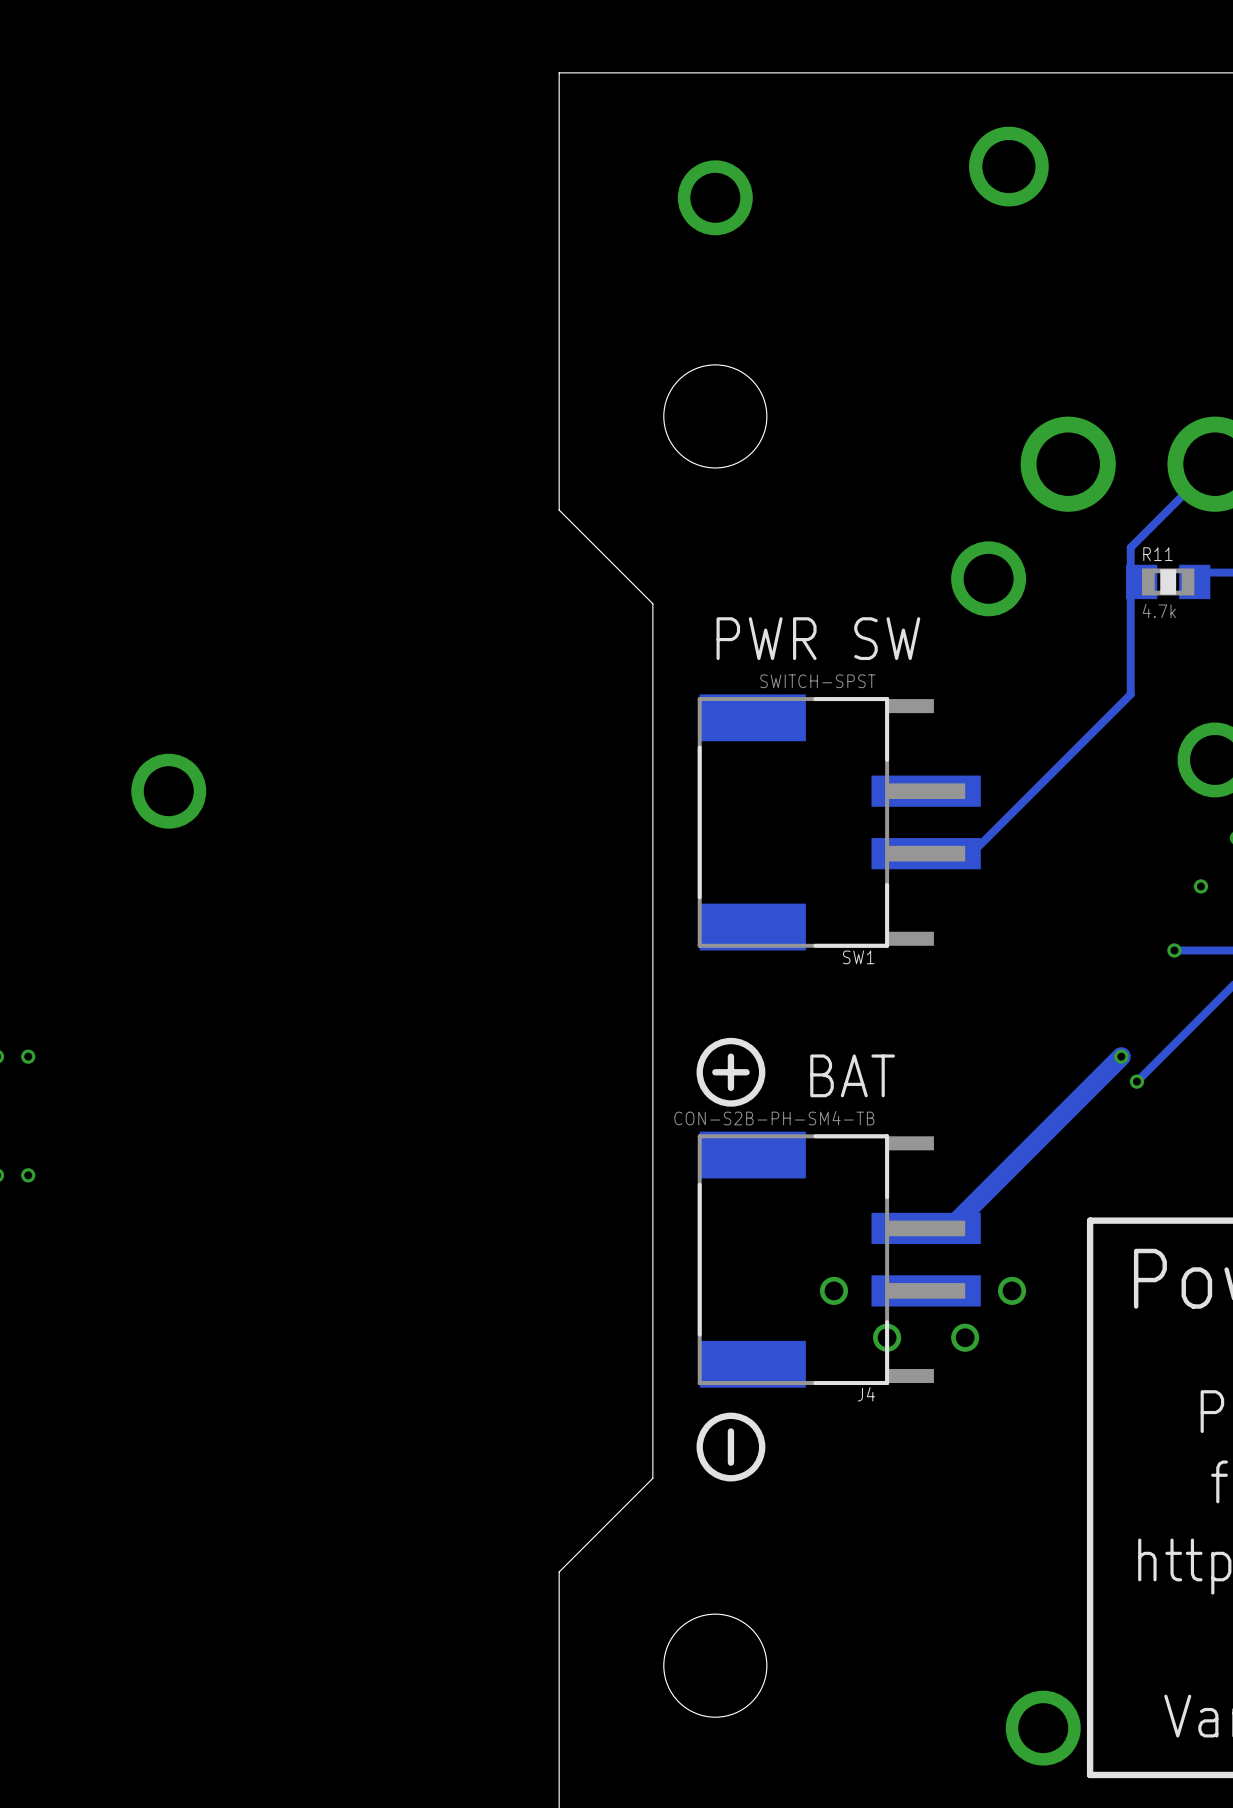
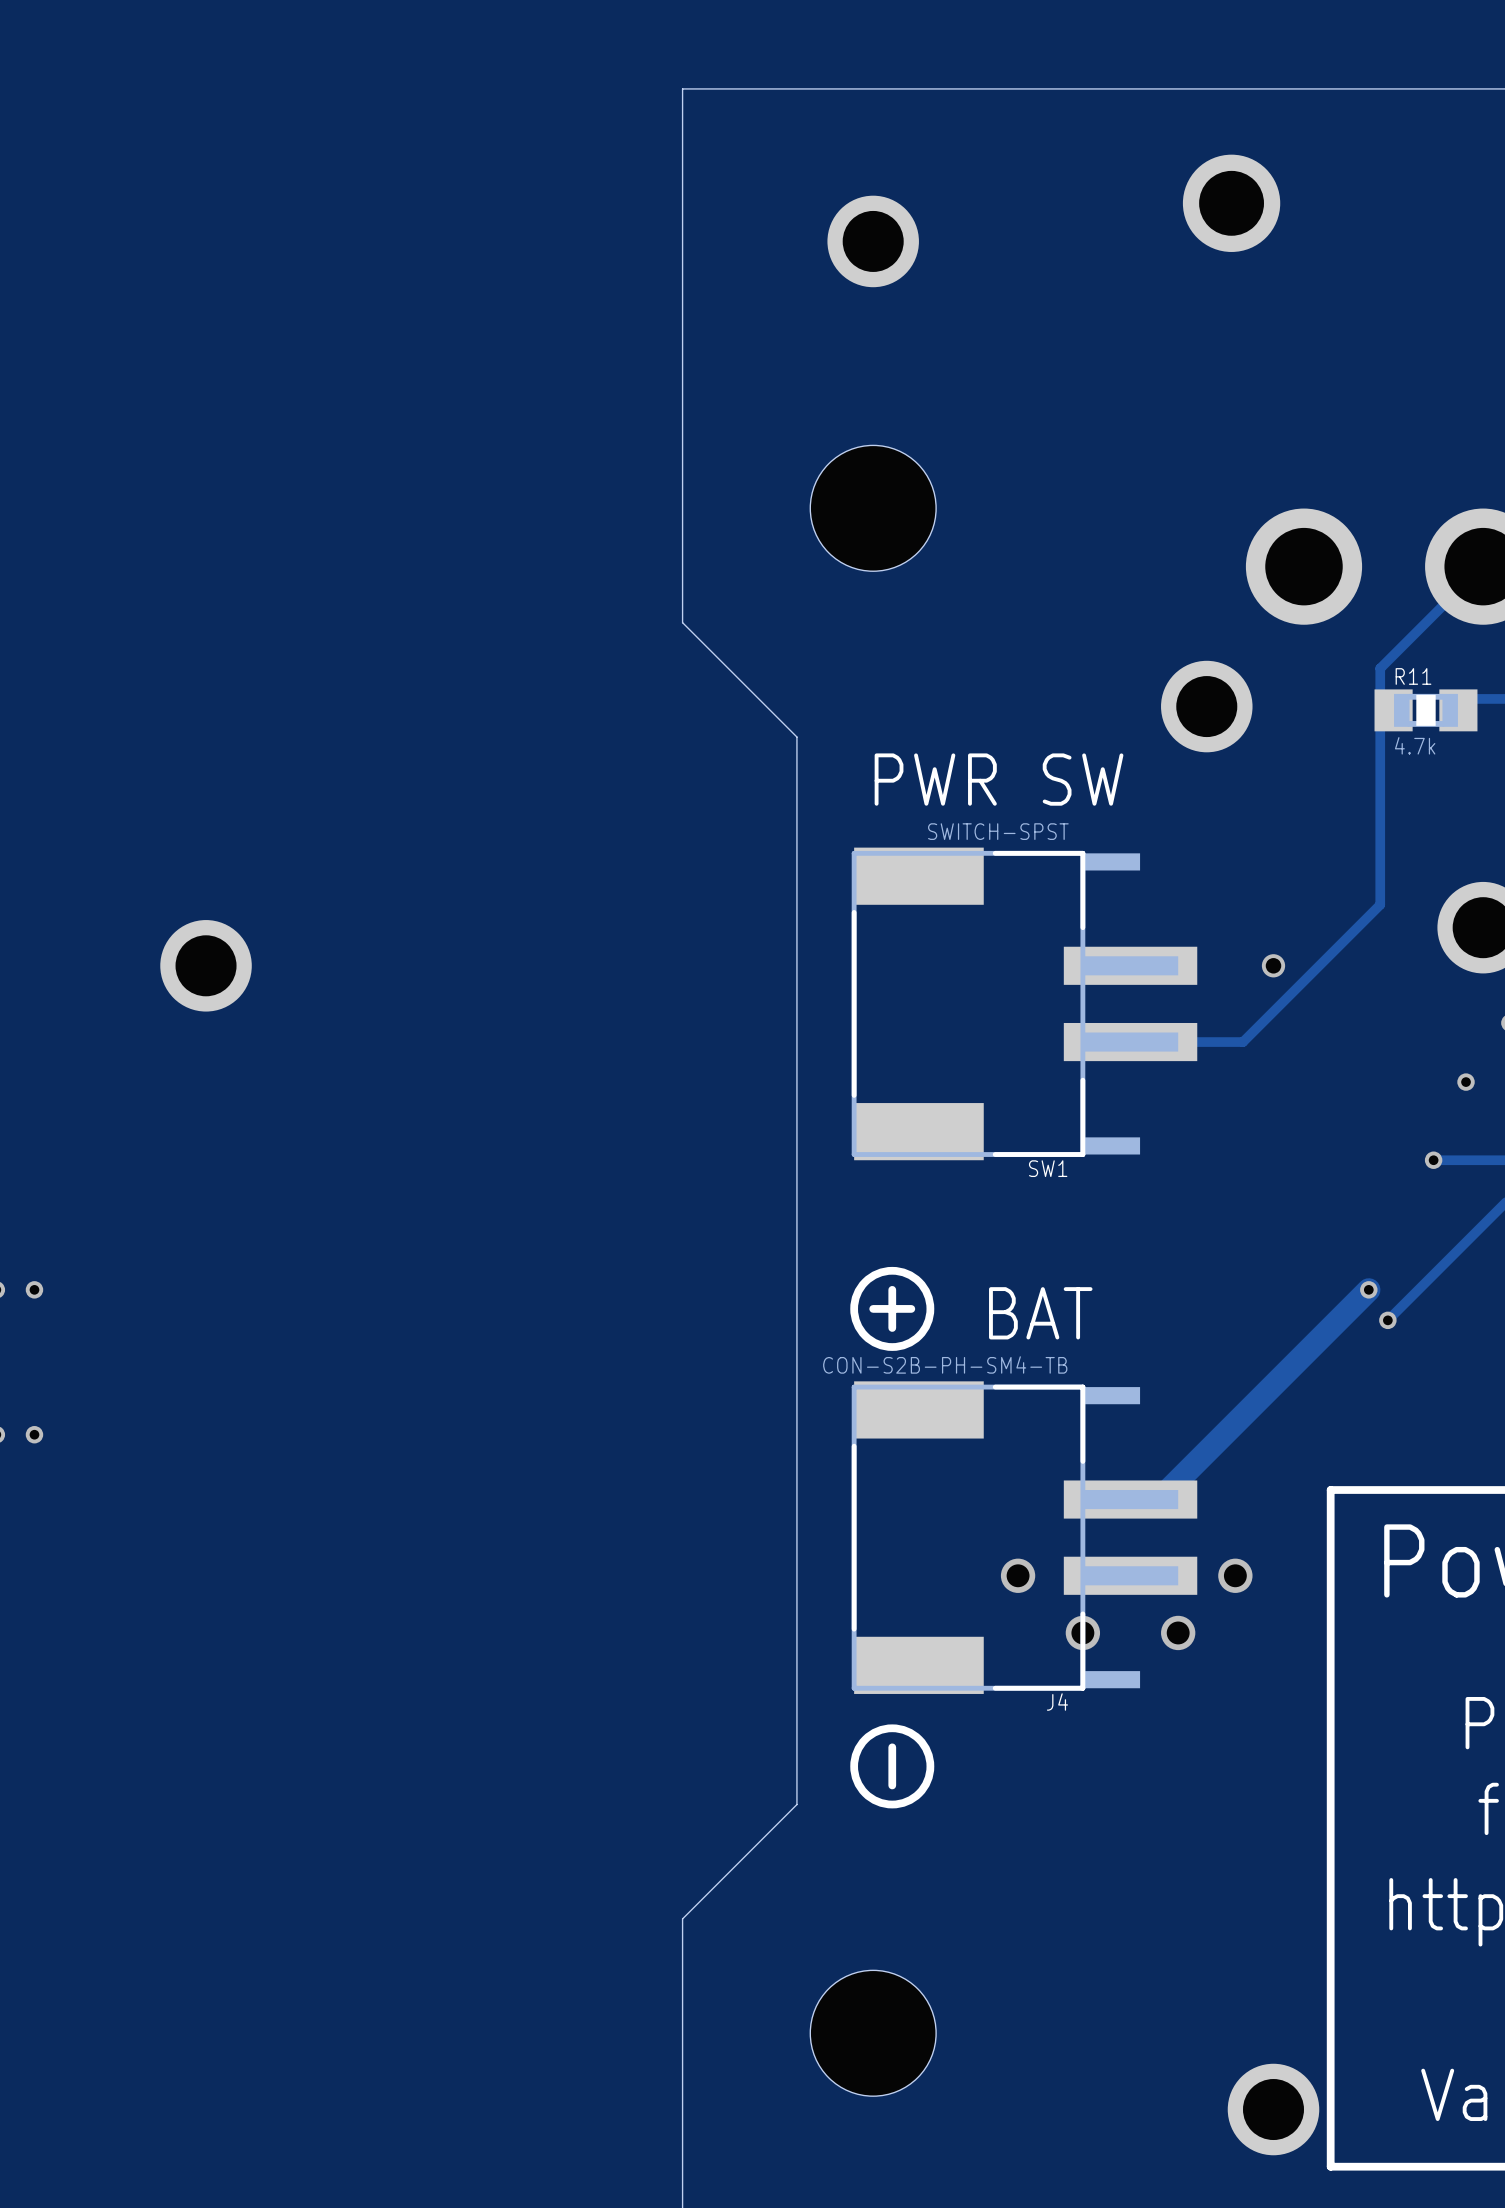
track: (1130, 694) (968, 856) -> (1380, 847) (1380, 904) (1243, 1042) (1178, 1042)
via: none -> (1273, 965)

